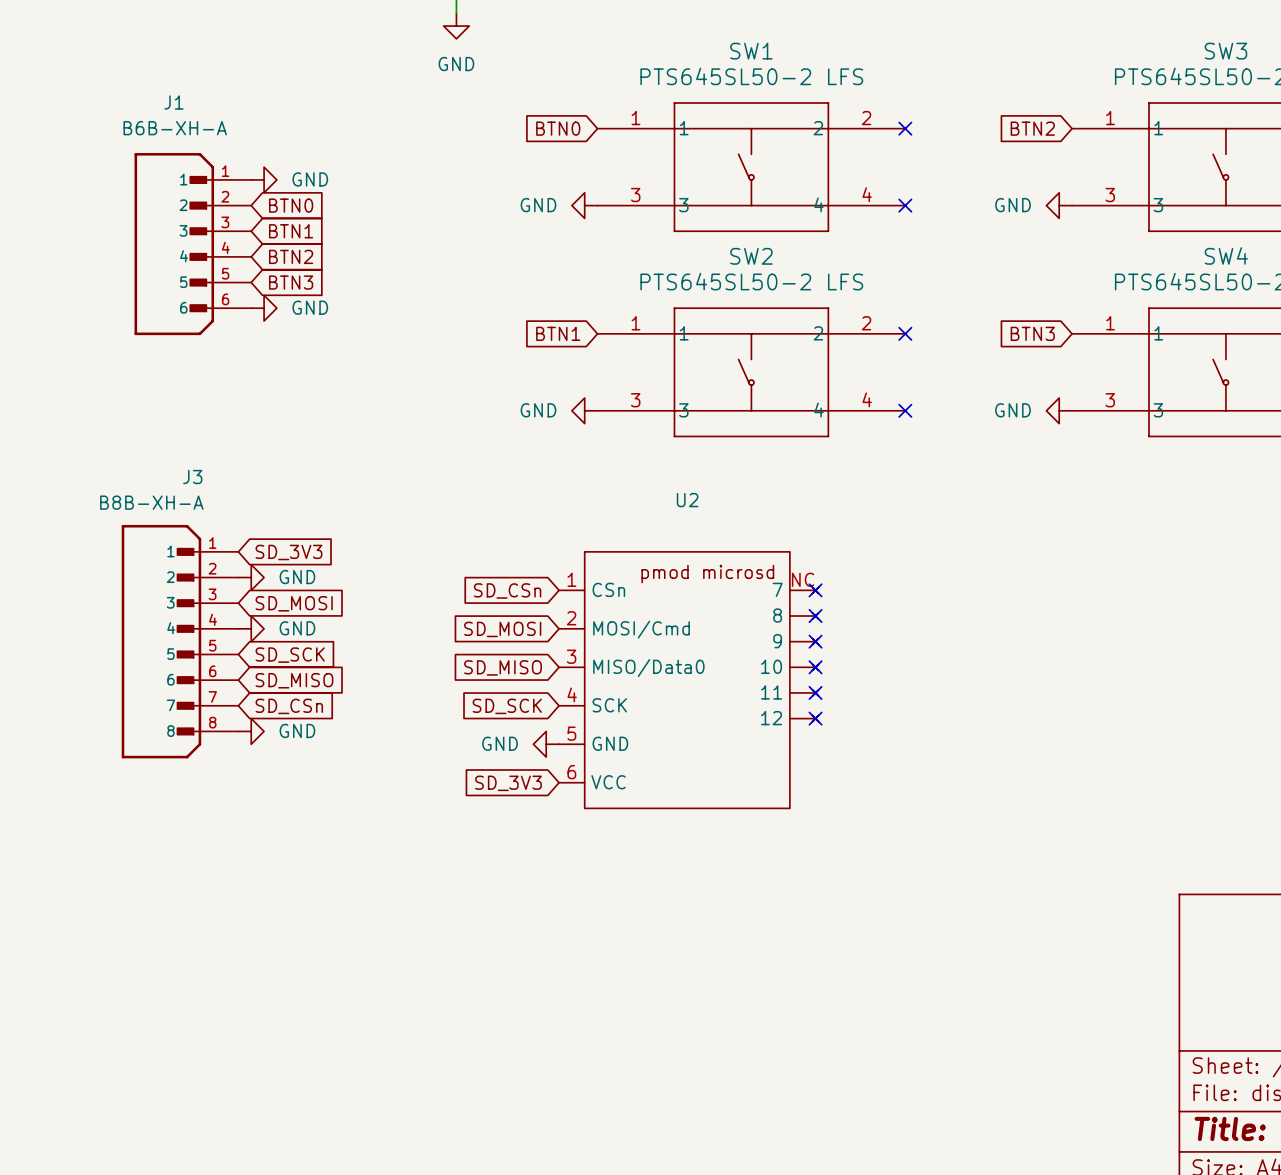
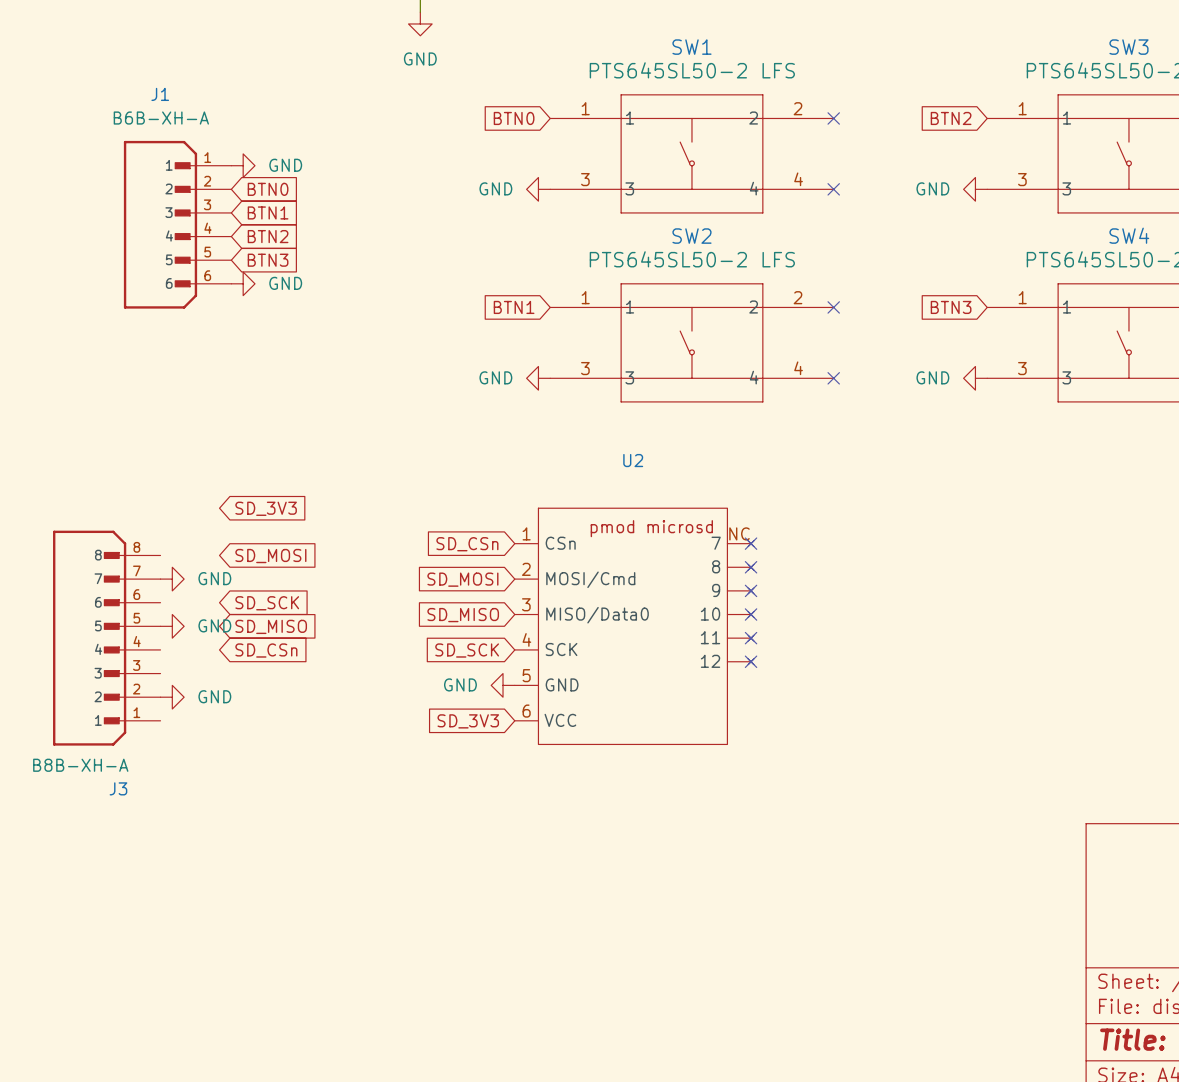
power symbol: GND (251, 577) -> none
power symbol: none -> GND (172, 579)
power symbol: GND (251, 628) -> none
J3 flip: as is (161, 641) -> up-down (89, 638)
power symbol: none -> GND (172, 626)
power symbol: GND (251, 731) -> none
power symbol: none -> GND (172, 697)

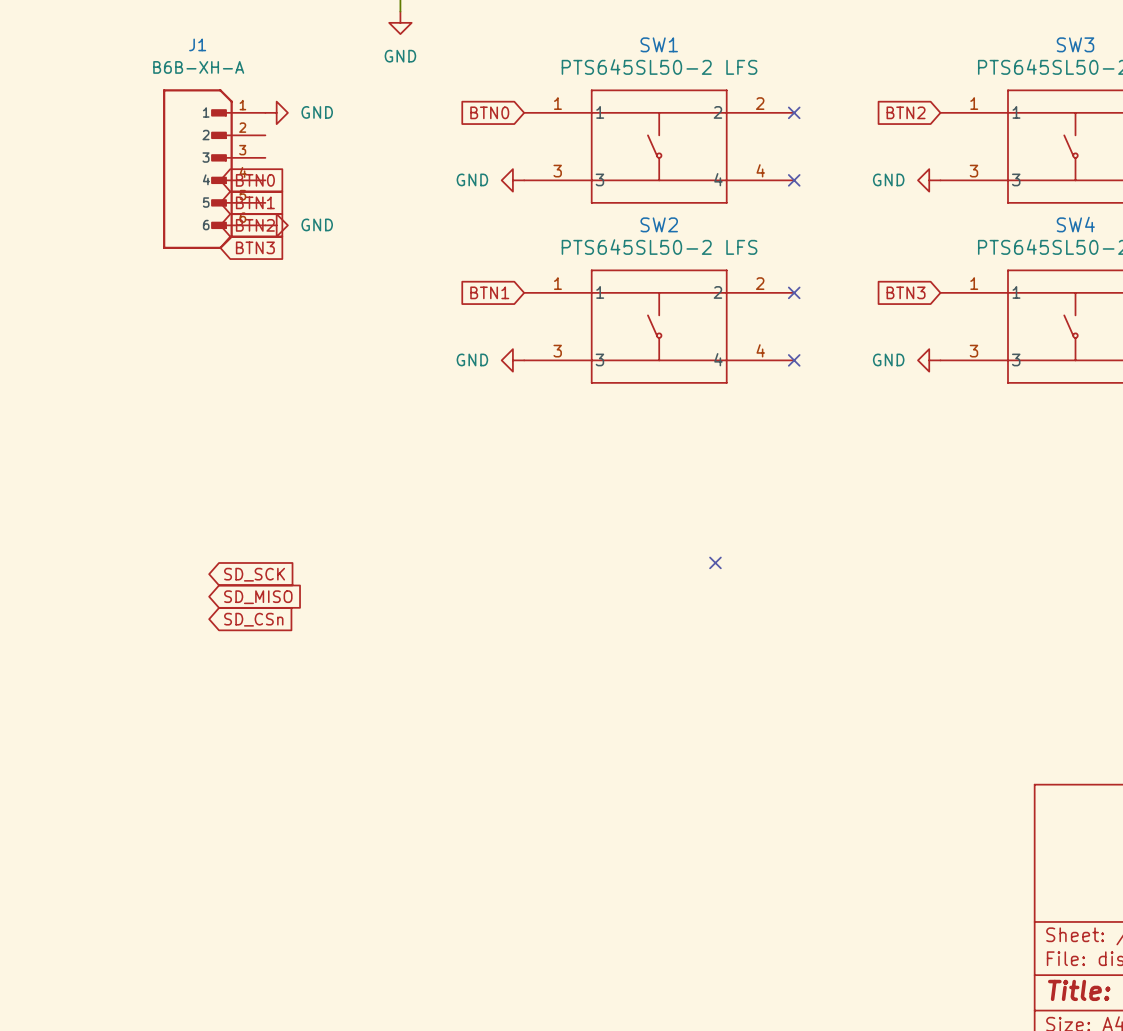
power symbol: none -> GND (276, 112)
power symbol: GND (243, 165) -> none
J1 position: (177, 224) -> (214, 169)
power symbol: none -> GND (276, 225)
power symbol: GND (243, 283) -> none
global label: SD_3V3 (266, 508) -> none
no-connect mark: (751, 543) -> none
global label: SD_CSn (467, 544) -> none
global label: SD_MOSI (270, 556) -> none
no-connect mark: (751, 567) -> none
power symbol: GND (172, 579) -> none
global label: SD_MOSI (462, 579) -> none
no-connect mark: (751, 614) -> none
global label: SD_MISO (463, 615) -> none
power symbol: GND (172, 626) -> none
U2: (634, 626) -> none
J3: B8B-XH-A (106, 638) -> none
no-connect mark: (751, 638) -> none
global label: SD_SCK (467, 650) -> none
no-connect mark: (751, 661) -> none
power symbol: GND (503, 685) -> none
power symbol: GND (172, 697) -> none
global label: SD_3V3 (468, 721) -> none

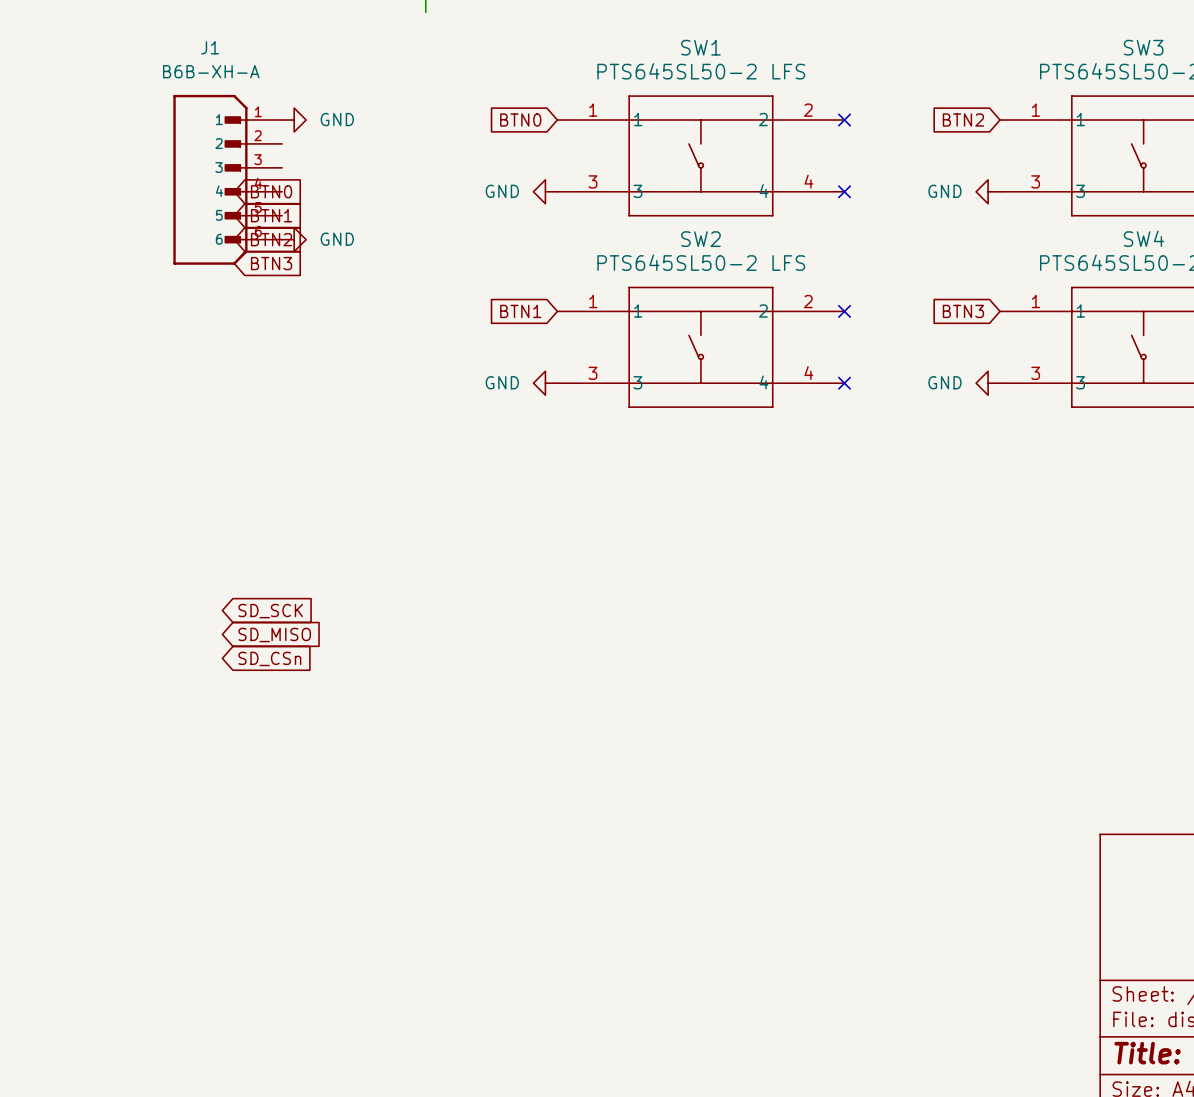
power symbol: GND (400, 22) -> none
no-connect mark: (715, 562) -> none

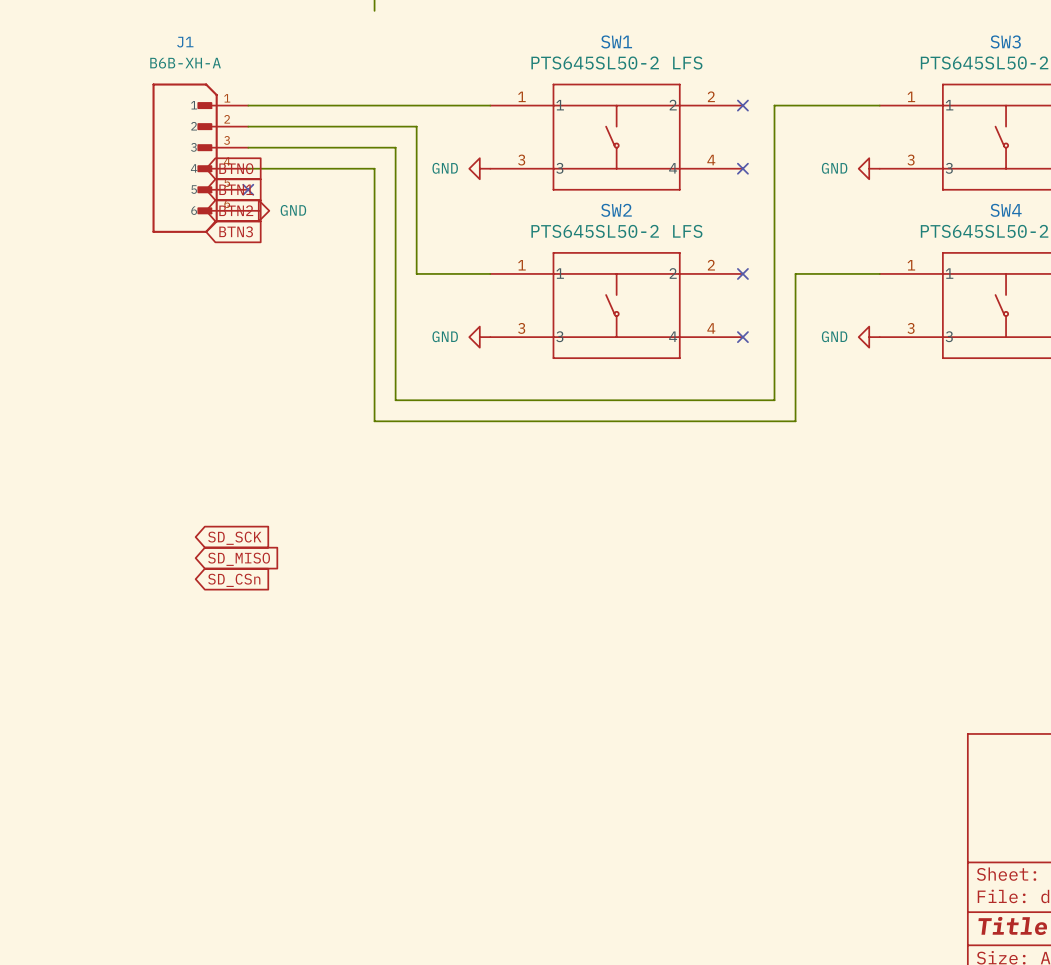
wire: none -> (248, 105) (490, 105)
power symbol: GND (294, 120) -> none
global label: BTN0 (520, 120) -> none
global label: BTN2 (963, 120) -> none
wire: none -> (879, 105) (774, 105) (774, 400) (395, 400) (395, 147) (248, 147)
wire: none -> (248, 126) (416, 126) (416, 273) (490, 273)
wire: none -> (248, 168) (374, 168) (374, 421) (795, 421) (795, 273) (879, 273)
no-connect mark: none -> (248, 189)
global label: BTN1 (520, 311) -> none
global label: BTN3 (963, 311) -> none

